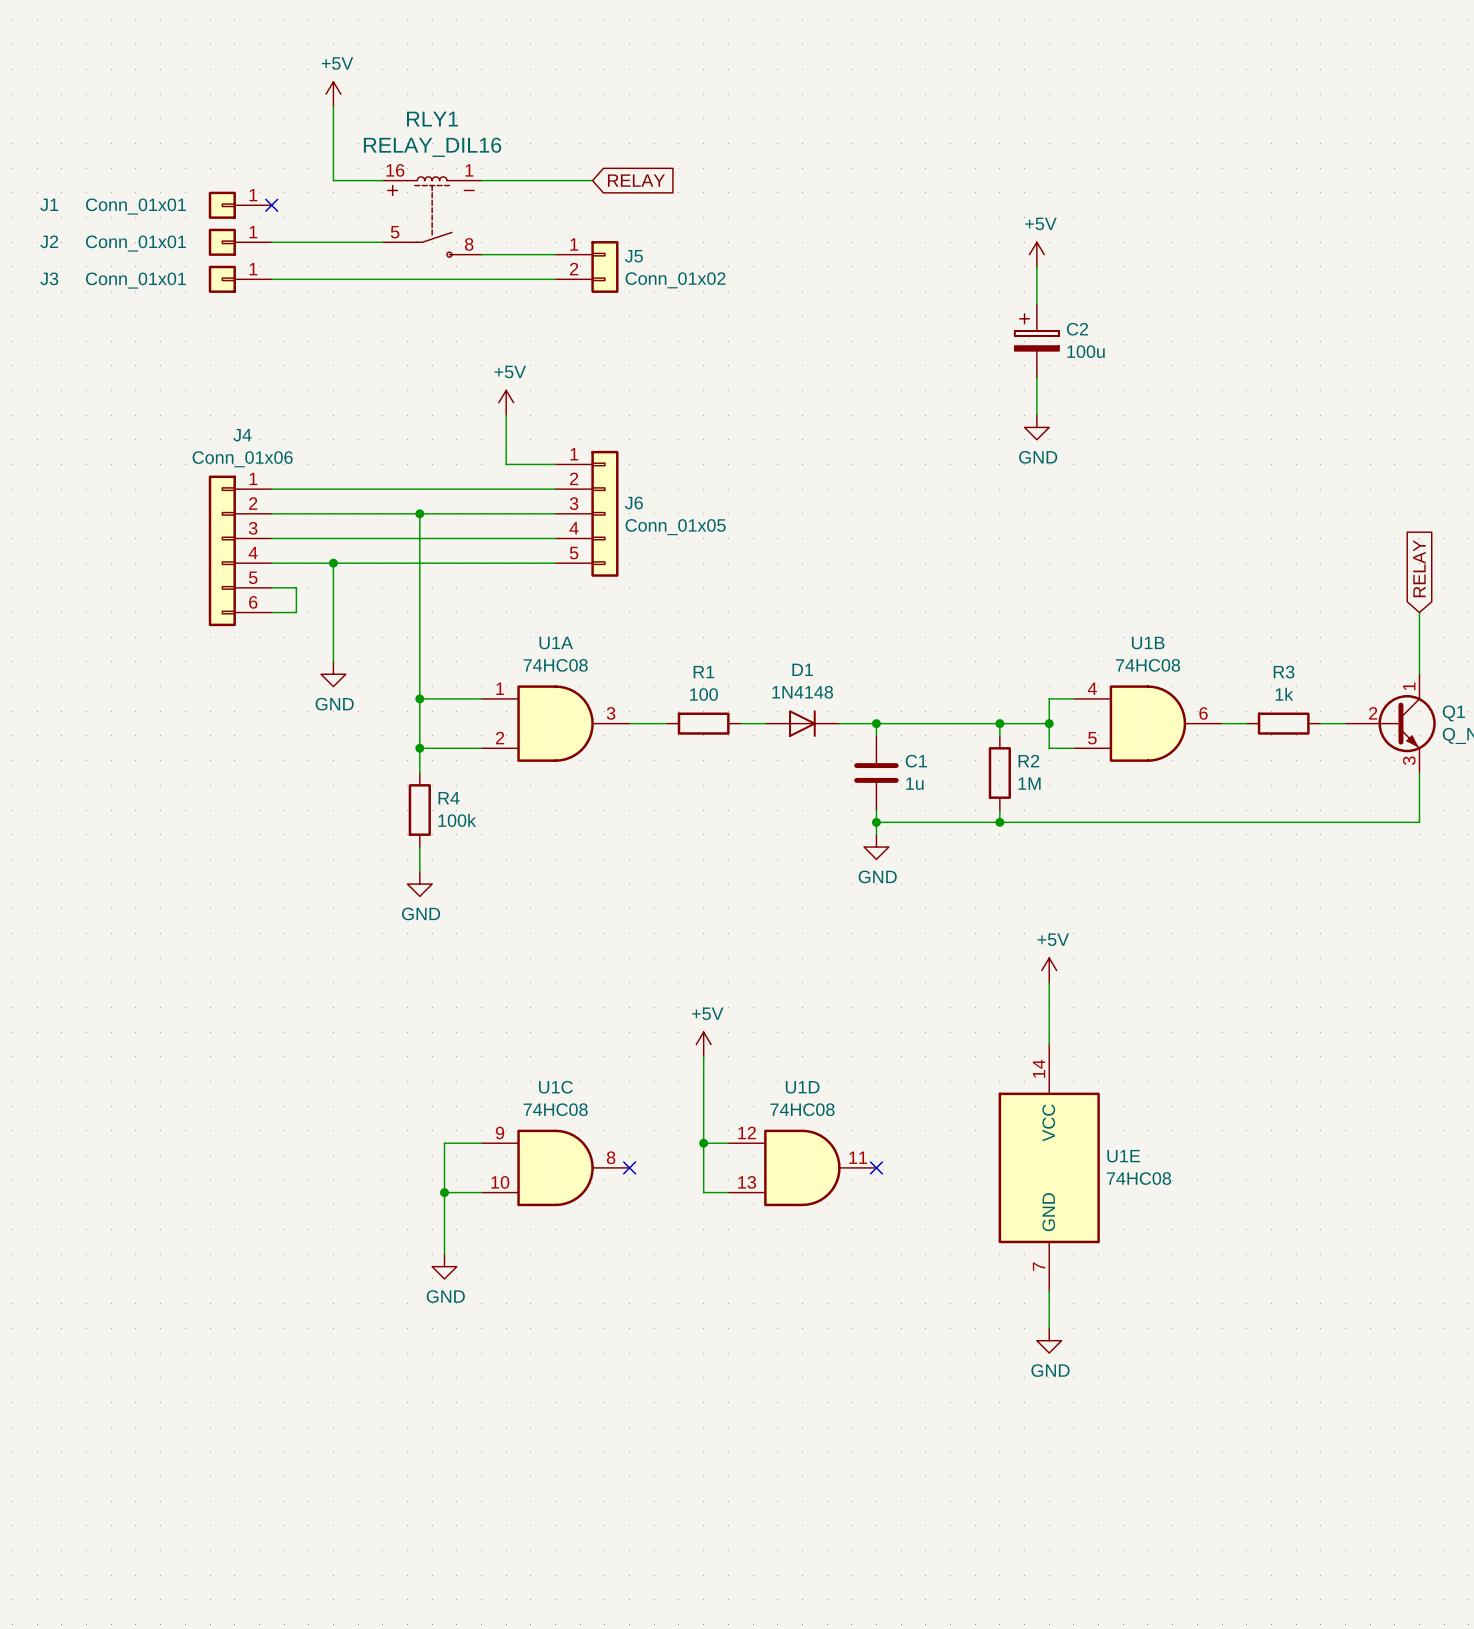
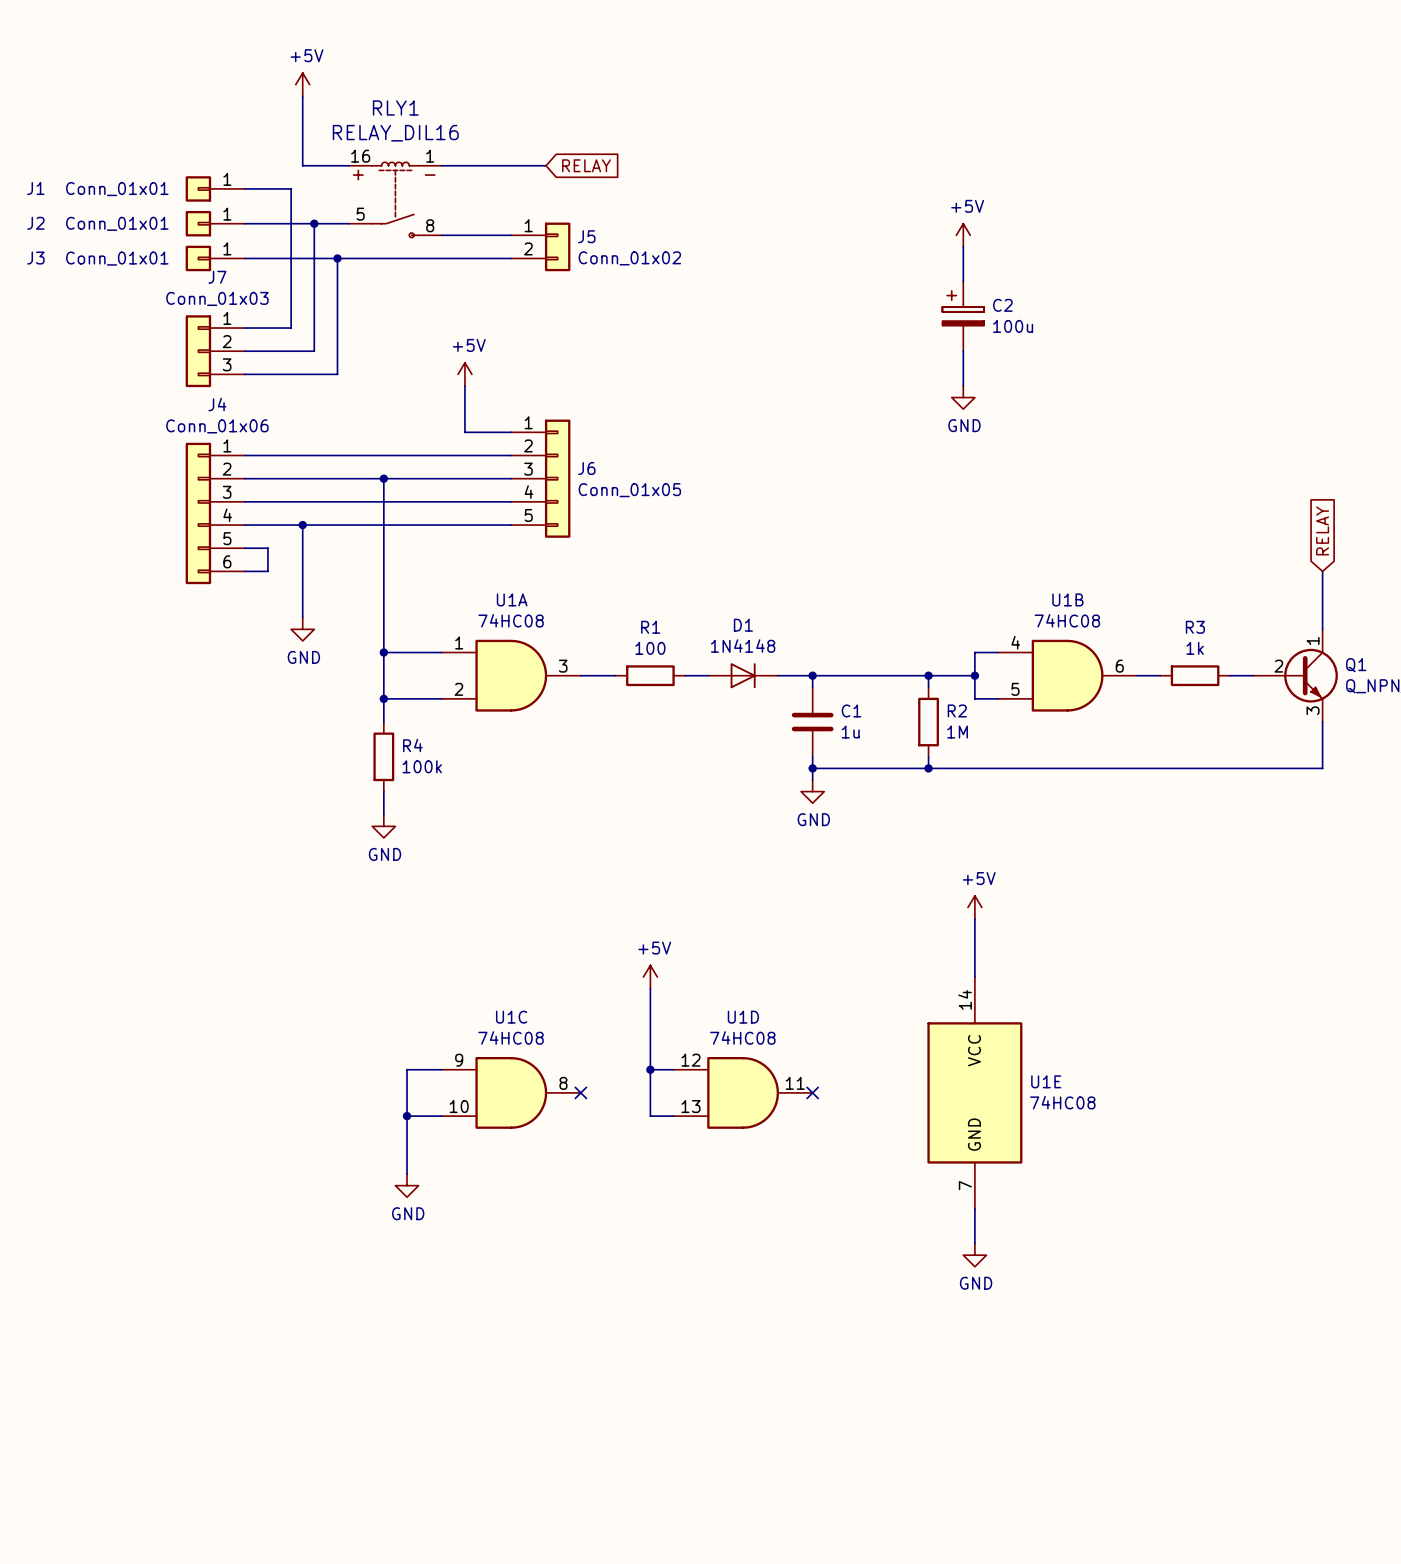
wire: none -> (244, 188) (291, 188) (291, 328) (244, 328)
no-connect mark: (271, 205) -> none
wire: none -> (314, 223) (314, 351) (244, 351)
junction: none -> (314, 223)
wire: none -> (337, 258) (337, 374) (244, 374)
junction: none -> (337, 258)
J7: none -> Conn_01x03 (215, 351)

